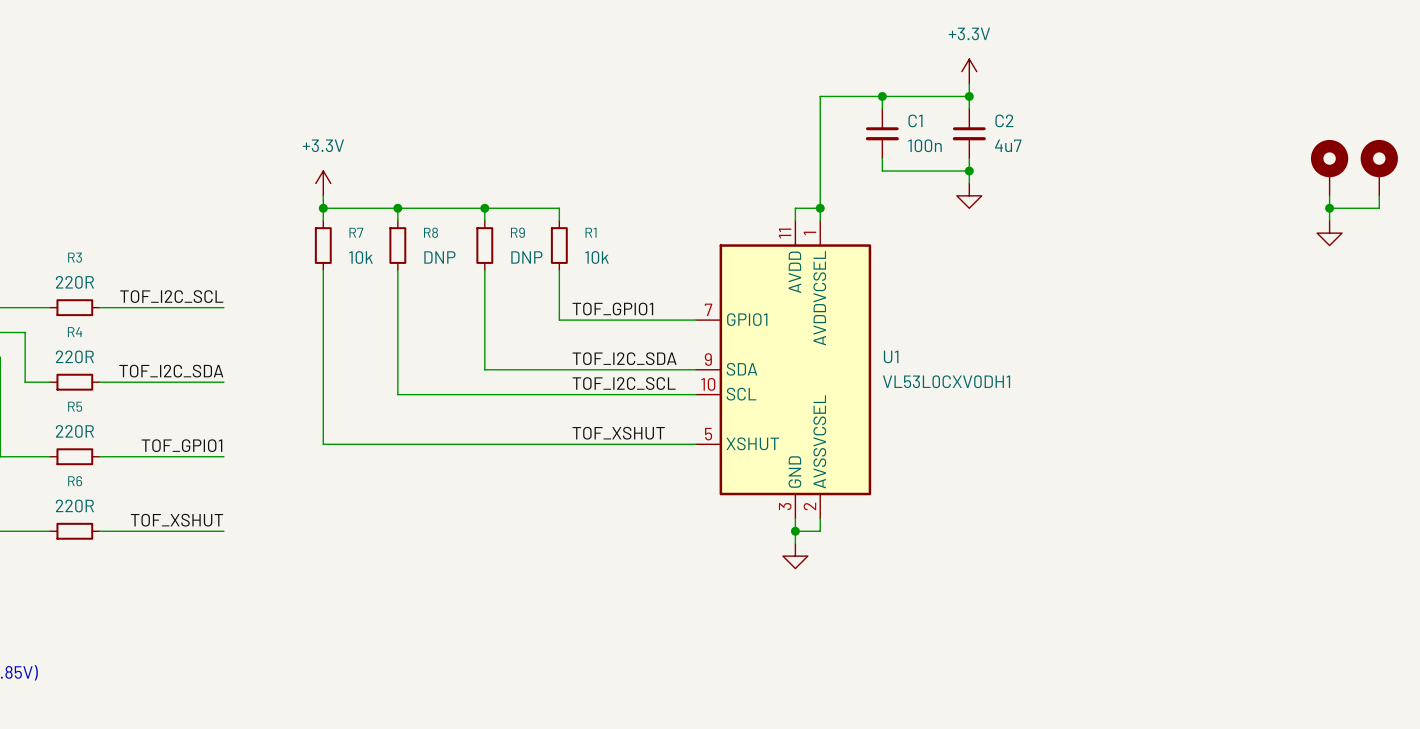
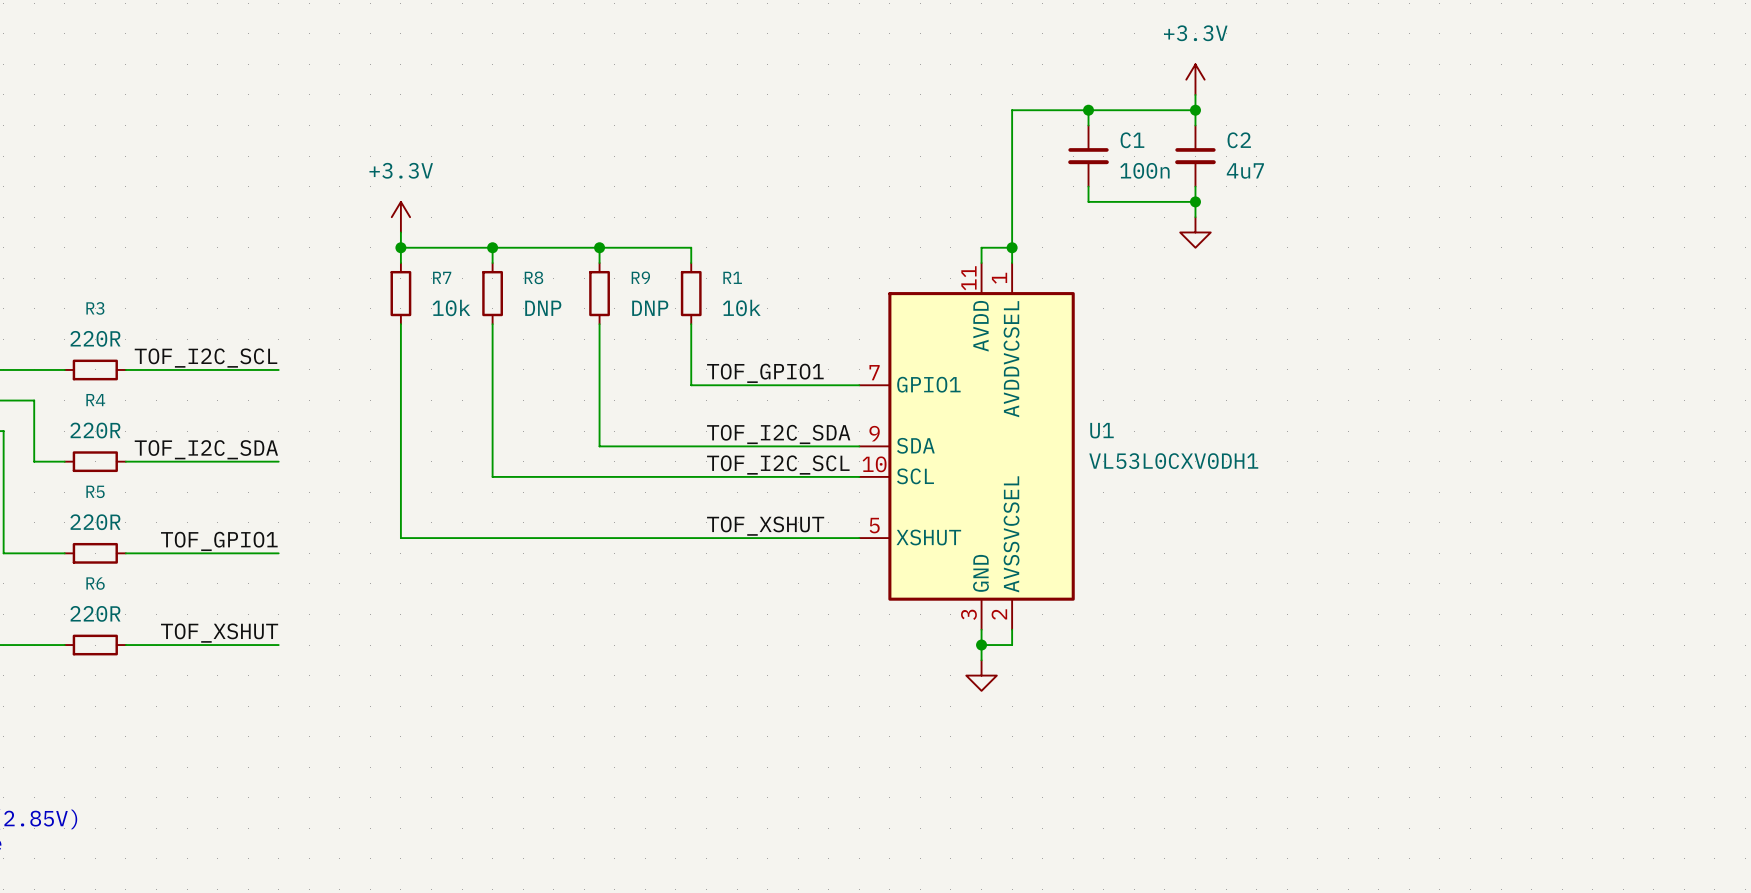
part: (1329, 167) -> none
part: (1379, 167) -> none
wire: (1329, 195) (1329, 220) -> none
wire: (1379, 195) (1379, 208) (1329, 208) -> none
junction: (1329, 208) -> none
power symbol: (1329, 233) -> none

